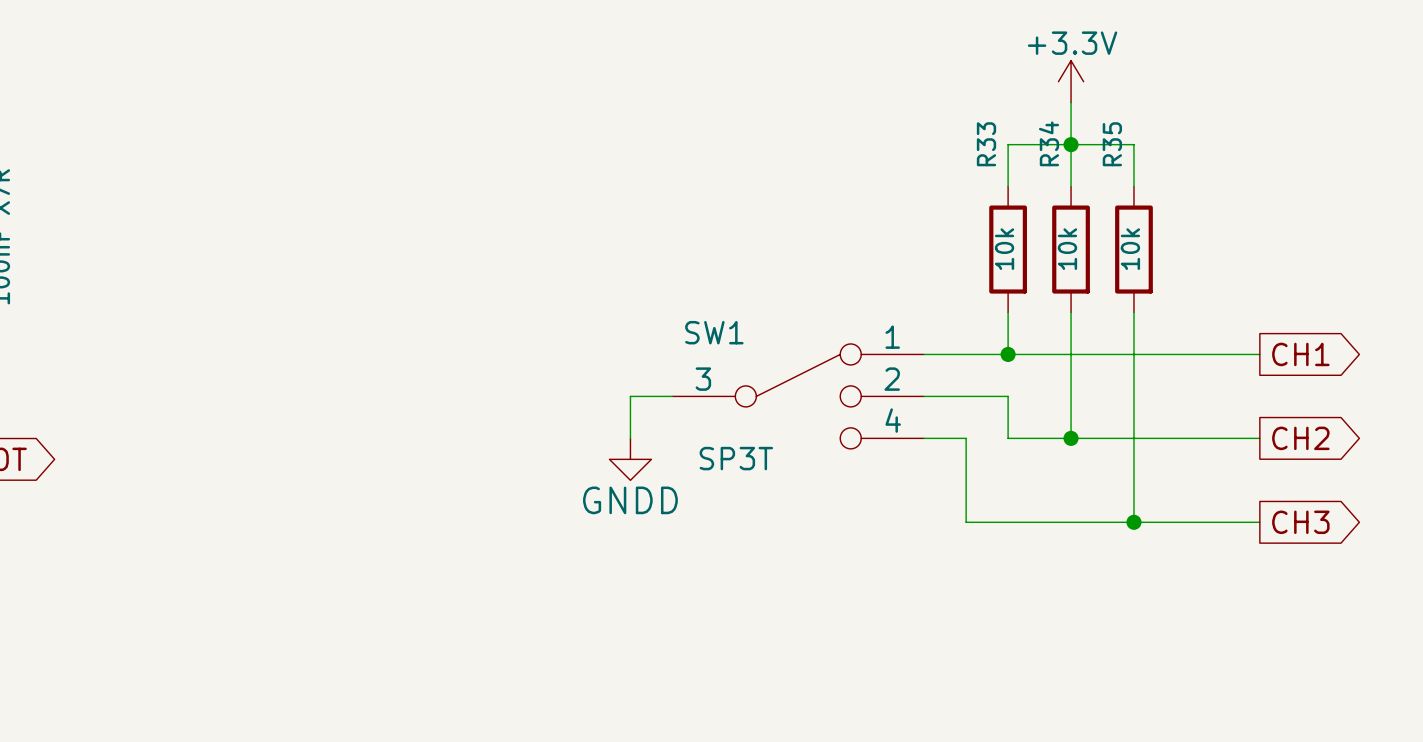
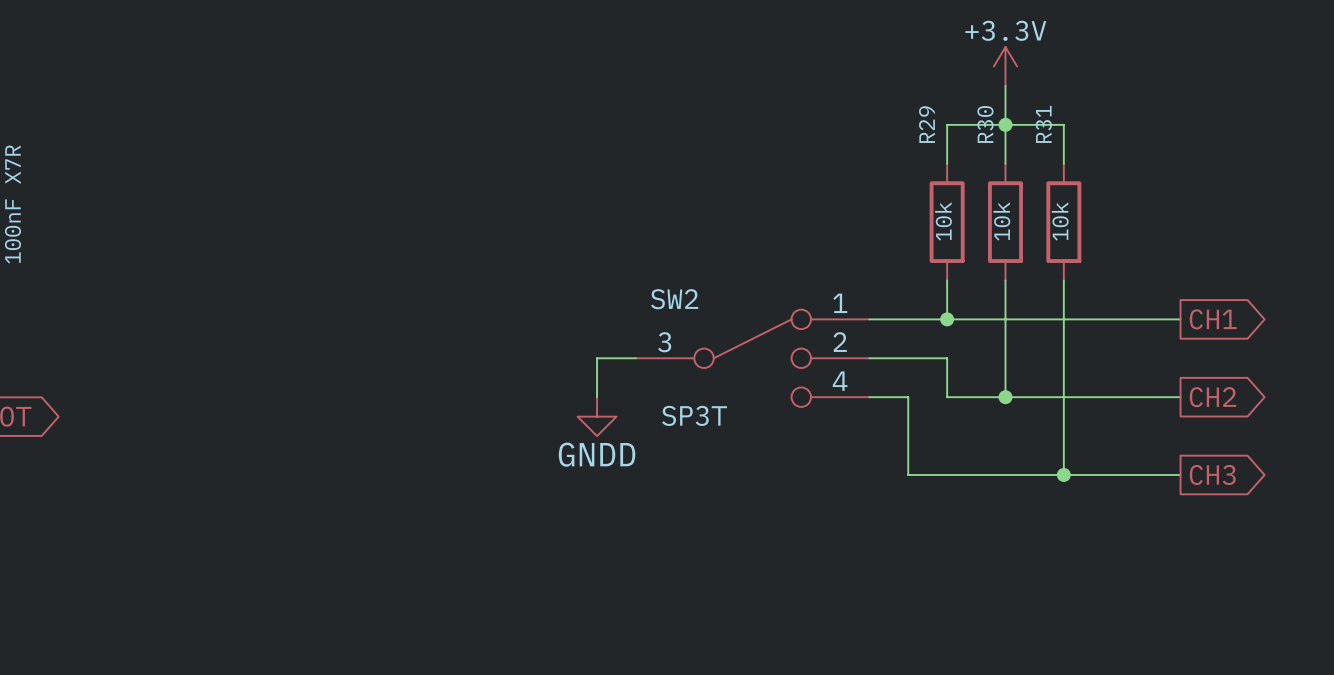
R34 name: R34 (1049, 143) -> R30 (985, 124)
R33 name: R33 (986, 144) -> R29 (926, 124)
R35 name: R35 (1112, 144) -> R31 (1043, 124)
SW1 name: SW1 (714, 332) -> SW2 (674, 299)

